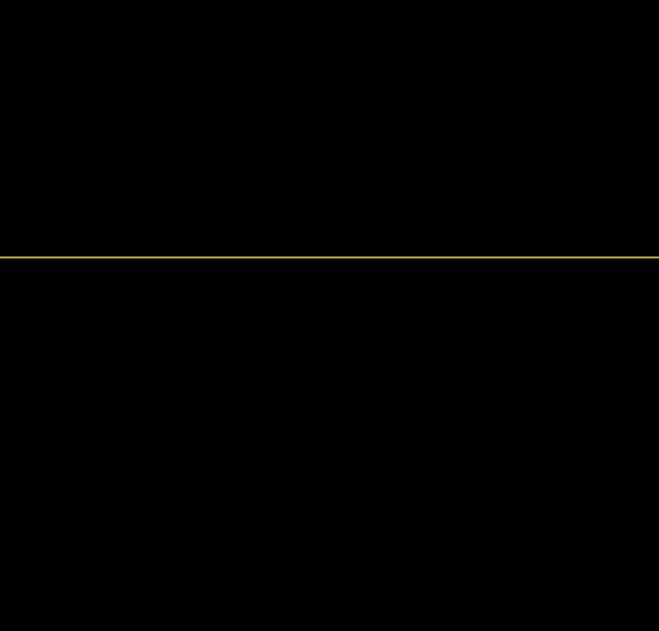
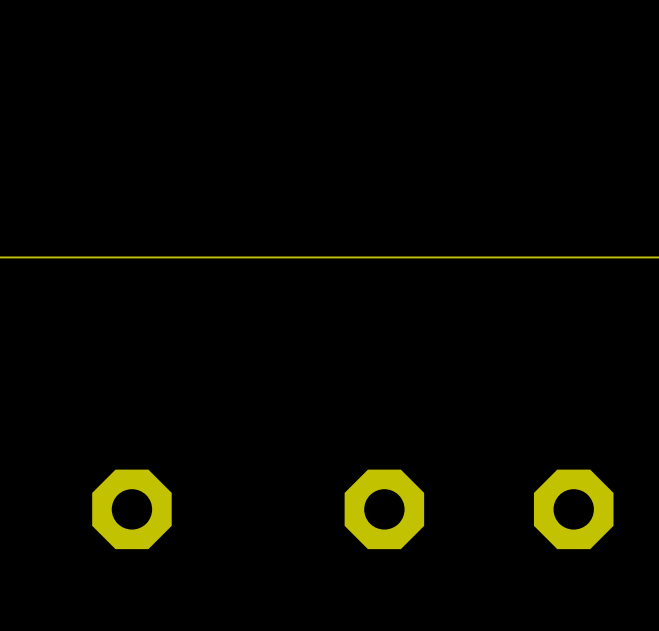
part: none -> (131, 509)
part: none -> (384, 509)
part: none -> (573, 509)

